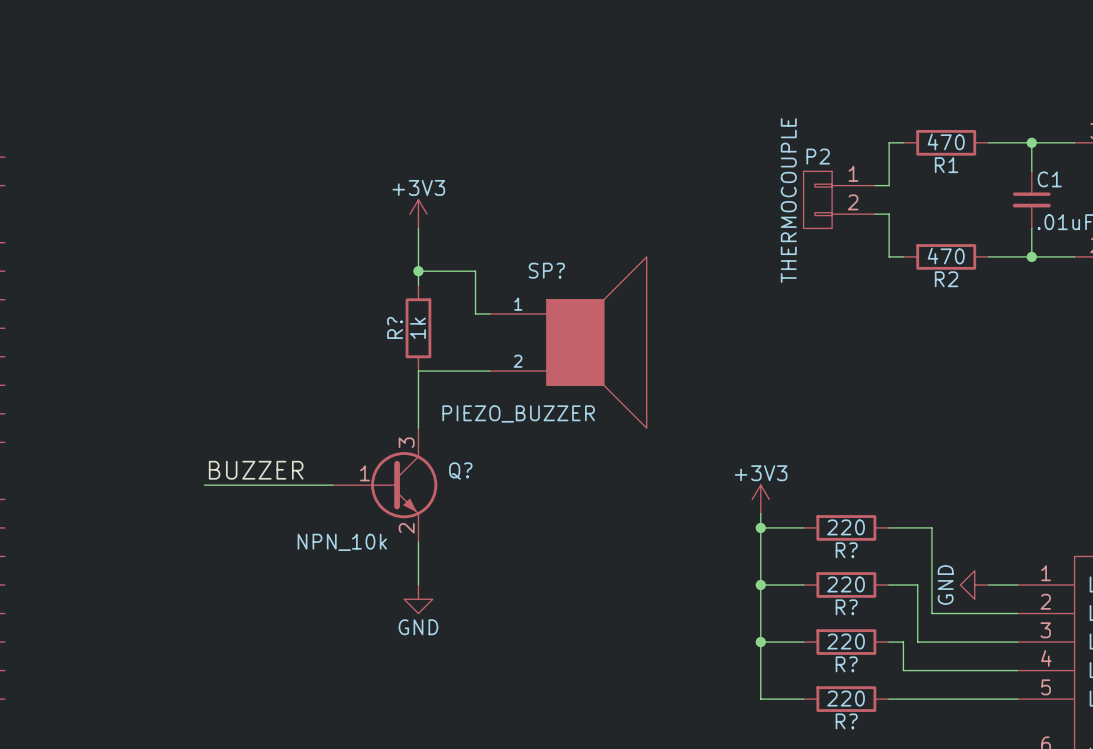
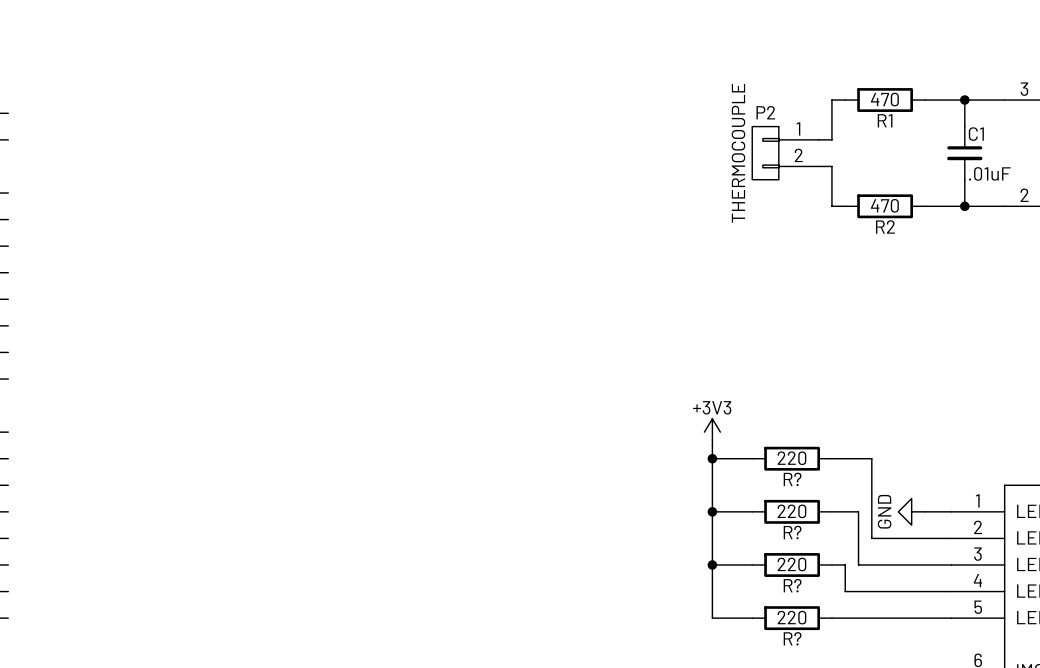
power symbol: +3V3 (418, 214) -> none
wire: (418, 228) (418, 285) -> none
wire: (418, 271) (475, 271) (475, 313) (489, 313) -> none
junction: (418, 271) -> none
R?: 1k (418, 328) -> none
SP?: PIEZO_BUZZER (568, 342) -> none
wire: (489, 371) (418, 371) (418, 428) -> none
label: BUZZER (256, 470) -> none
wire: (204, 485) (332, 485) -> none
Q?: NPN_10k (385, 485) -> none
wire: (418, 542) (418, 585) -> none
power symbol: GND (418, 599) -> none

